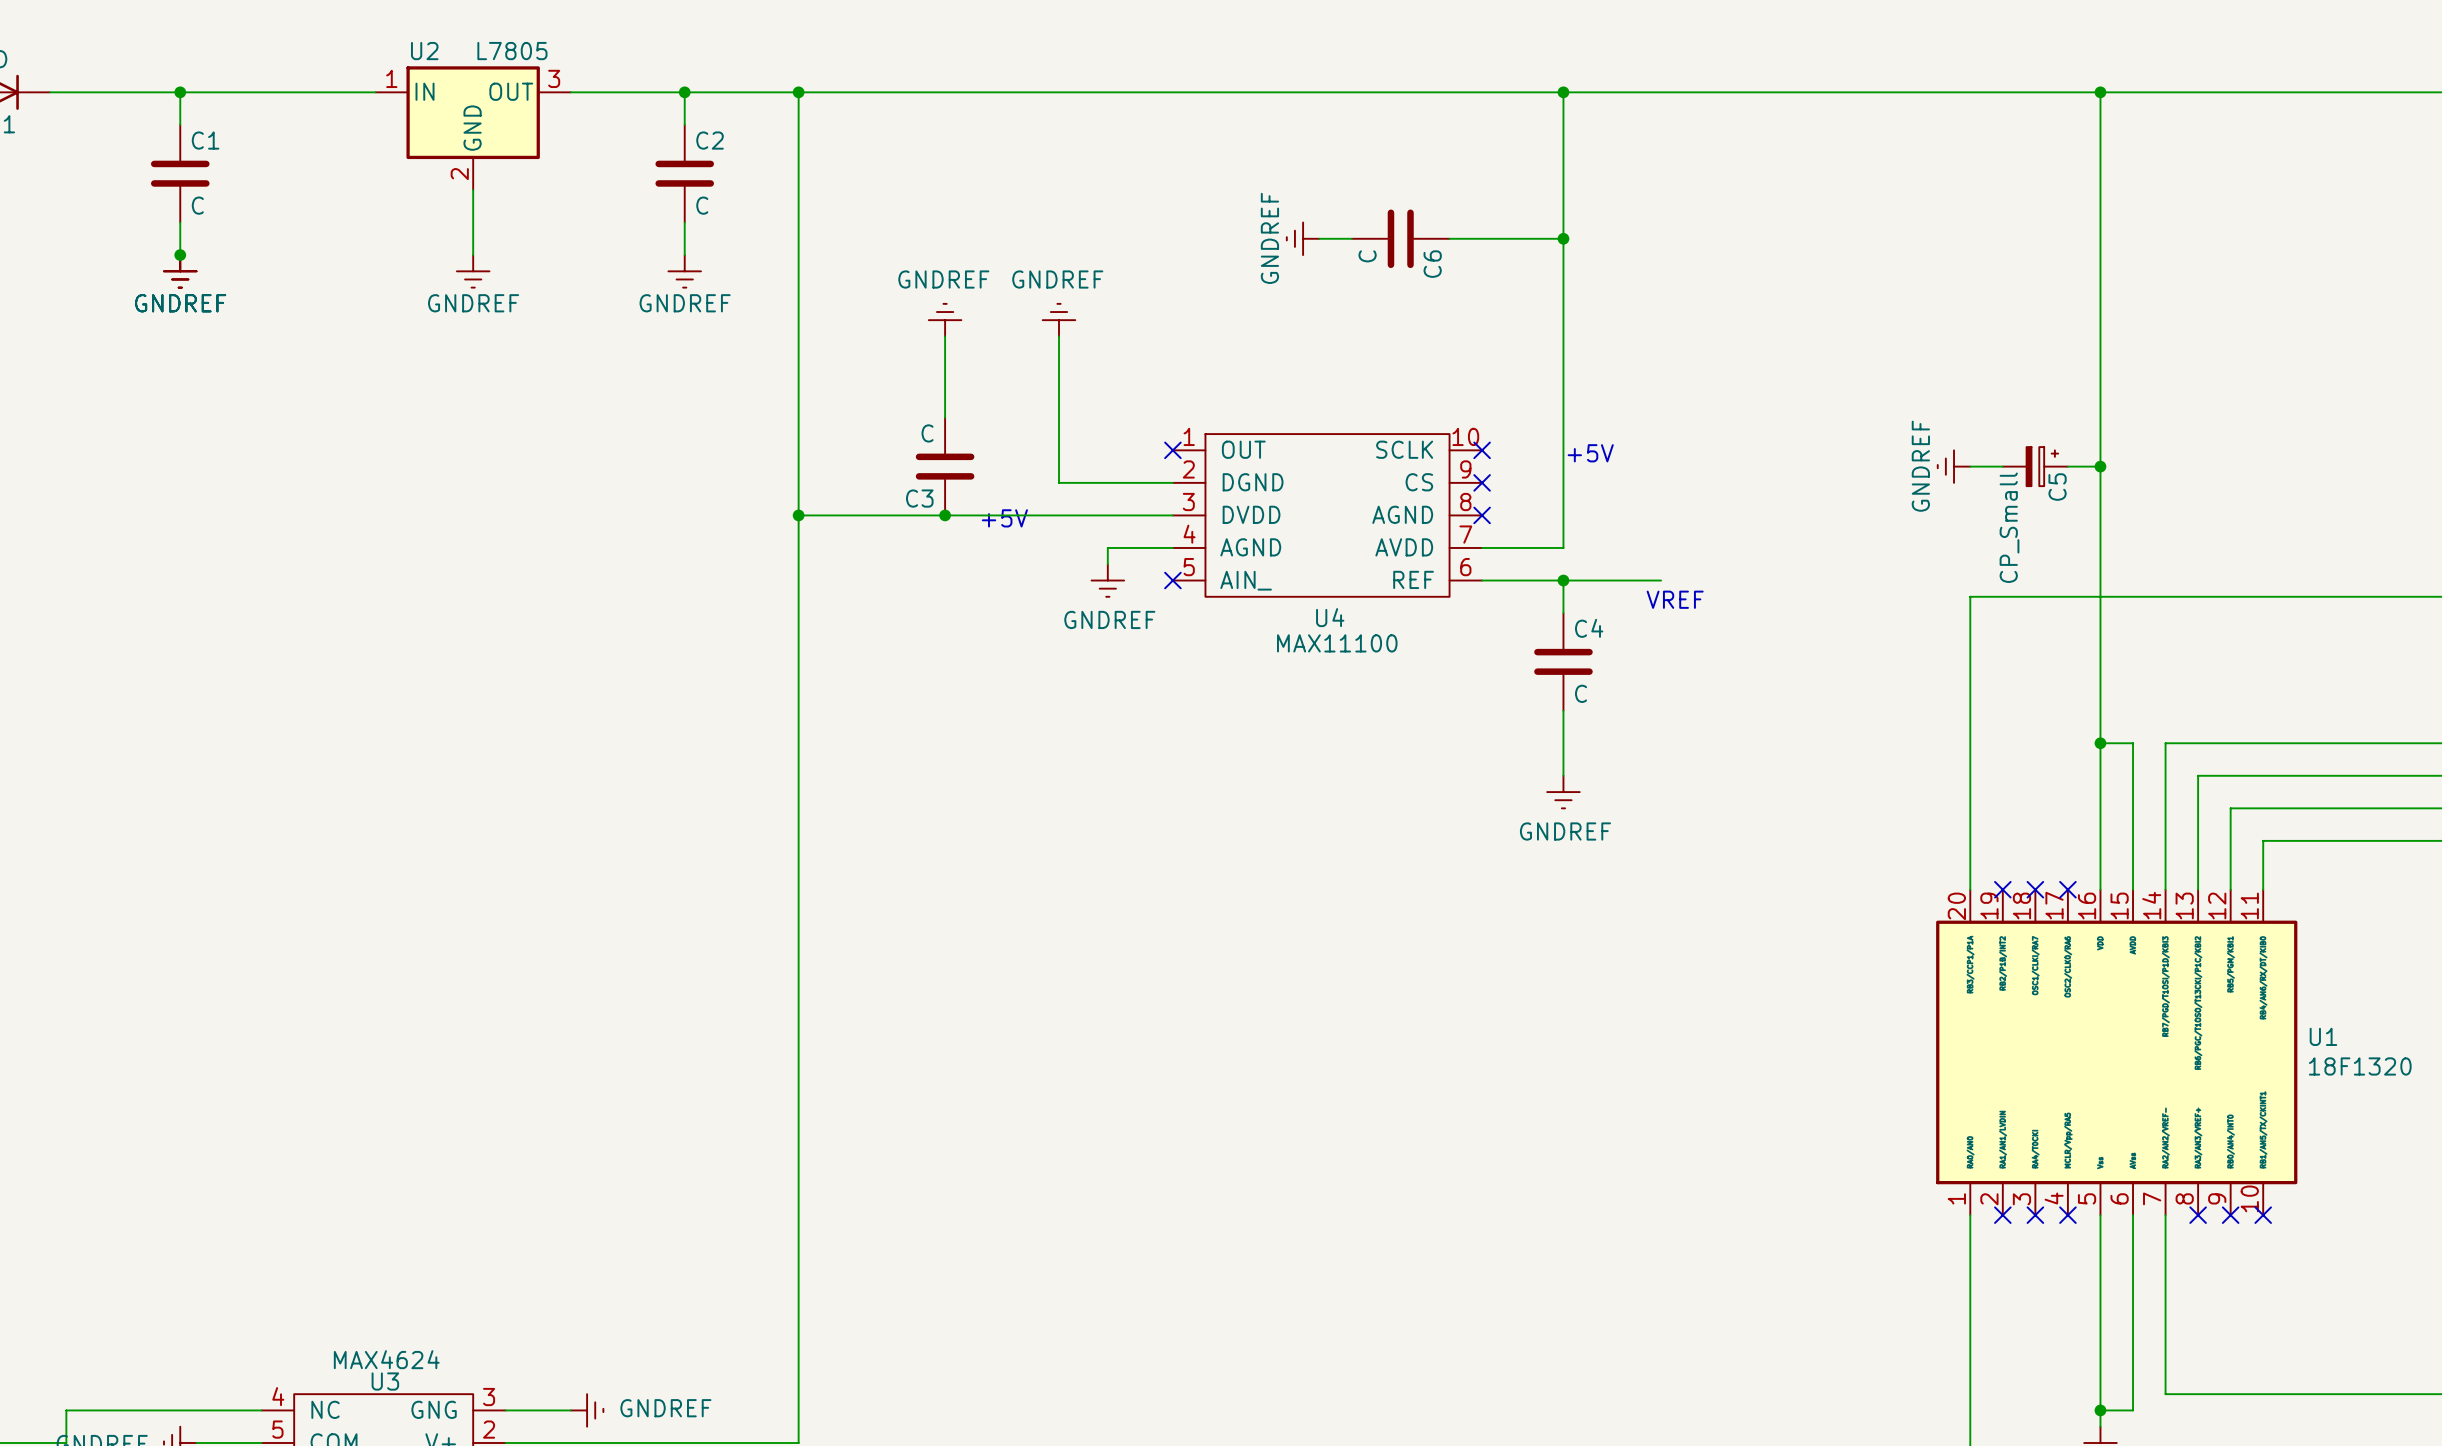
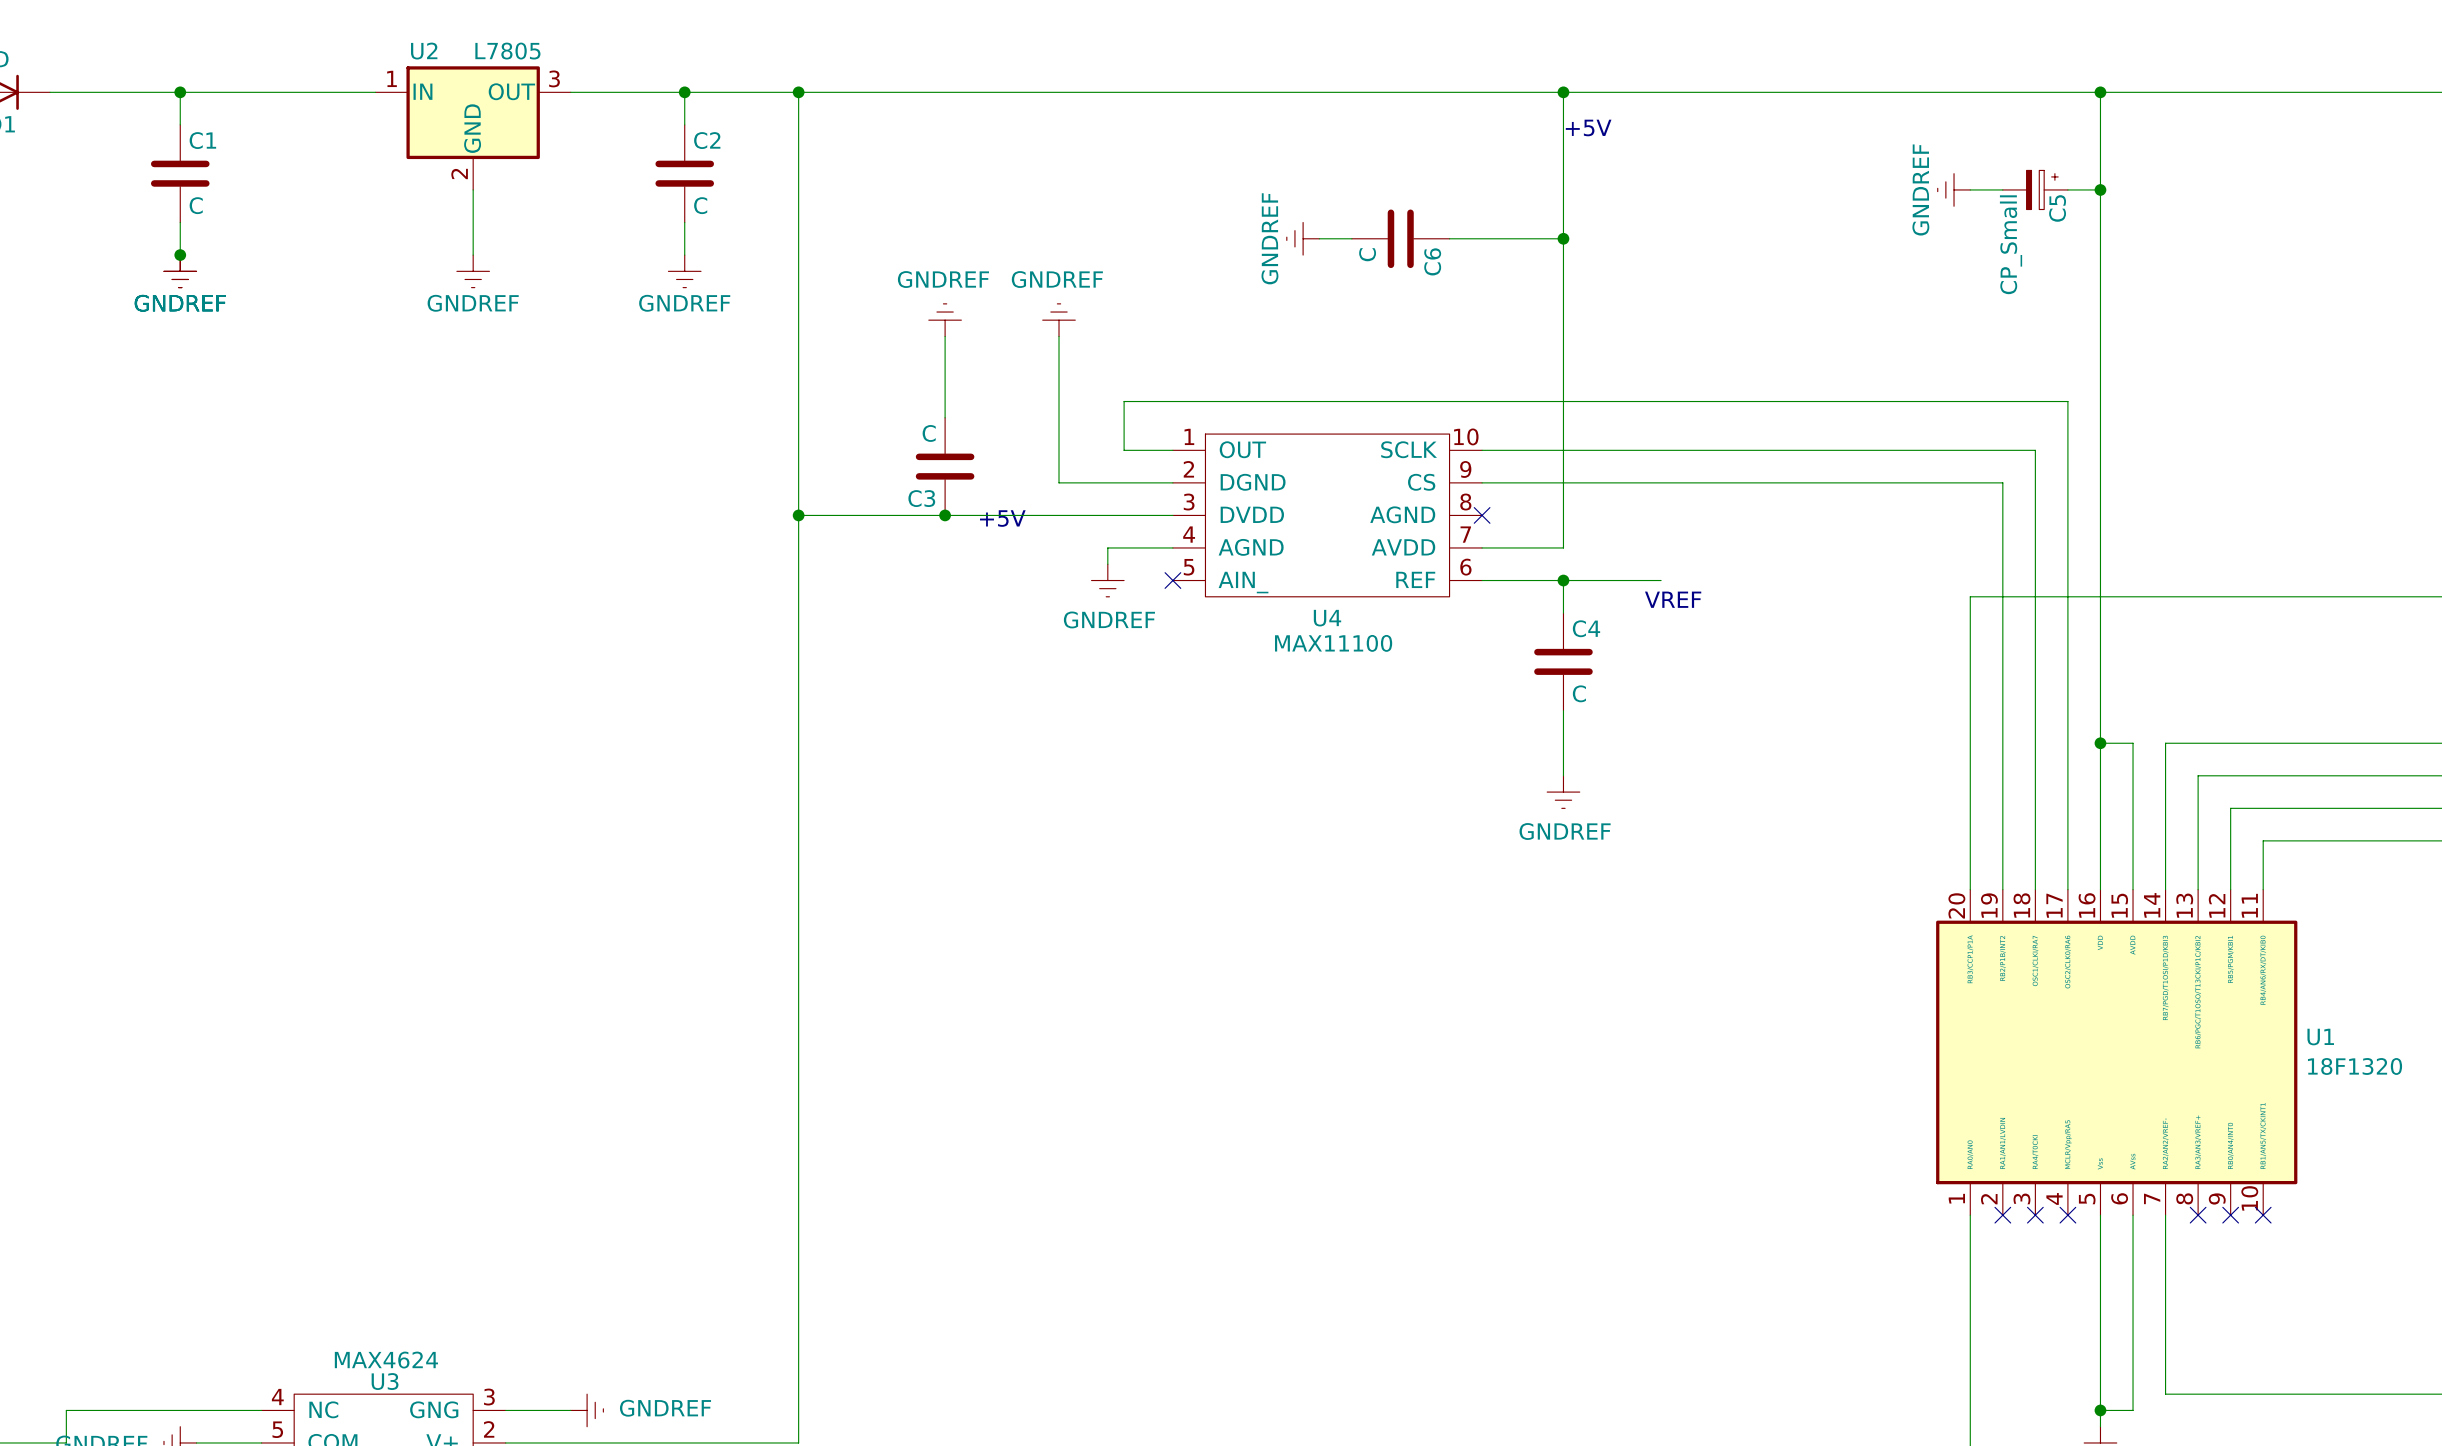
text: none -> +5V (1588, 127)
junction: none -> (2100, 189)
wire: none -> (1172, 450) (1124, 450) (1124, 401) (2067, 401) (2067, 889)
no-connect mark: (1172, 450) -> none
wire: none -> (1482, 450) (2035, 450) (2035, 889)
no-connect mark: (1482, 450) -> none
text: +5V (1590, 453) -> none
power symbol position: GNDREF (1954, 466) -> GNDREF (1954, 189)
wire: (1970, 466) (2002, 466) -> (1970, 189) (2002, 189)
C5 position: (2035, 466) -> (2035, 189)
wire: (2067, 466) (2100, 466) -> (2067, 189) (2100, 189)
junction: (2100, 466) -> none
wire: none -> (1482, 482) (2002, 482) (2002, 889)
no-connect mark: (1482, 482) -> none
no-connect mark: (2002, 889) -> none
no-connect mark: (2035, 889) -> none
no-connect mark: (2067, 889) -> none

